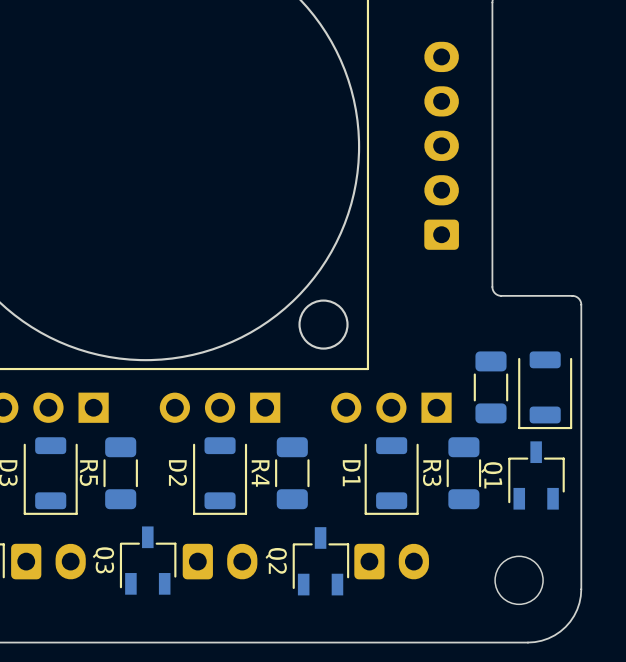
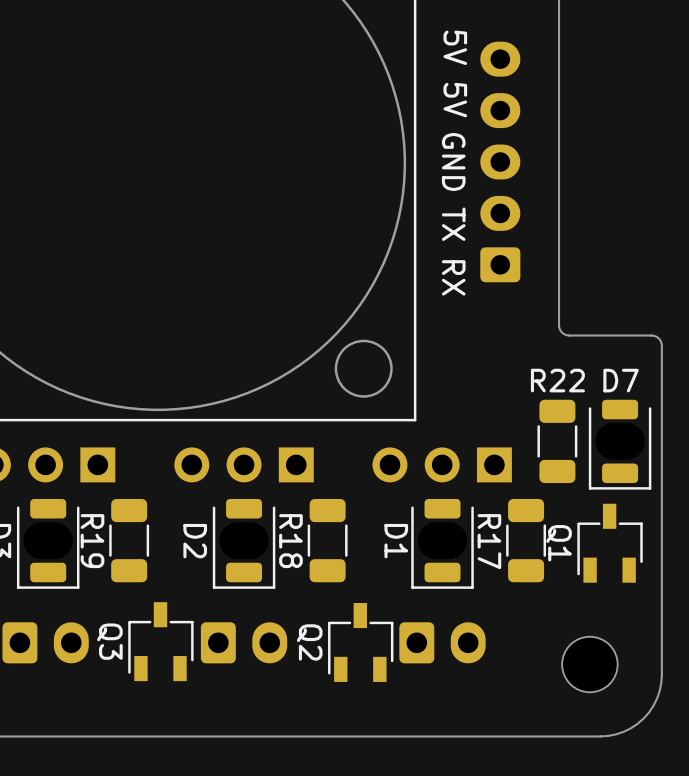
text: none -> 5V (455, 47)
text: none -> 5V (455, 100)
text: none -> GND (453, 161)
text: none -> TX (453, 224)
text: none -> RX (453, 277)
R22 name: none -> R22 (557, 380)
D7 name: none -> D7 (621, 380)
R5 name: R5 (88, 473) -> R19 (92, 541)
R4 name: R4 (260, 473) -> R18 (290, 541)
R3 name: R3 (432, 473) -> R17 (489, 541)

